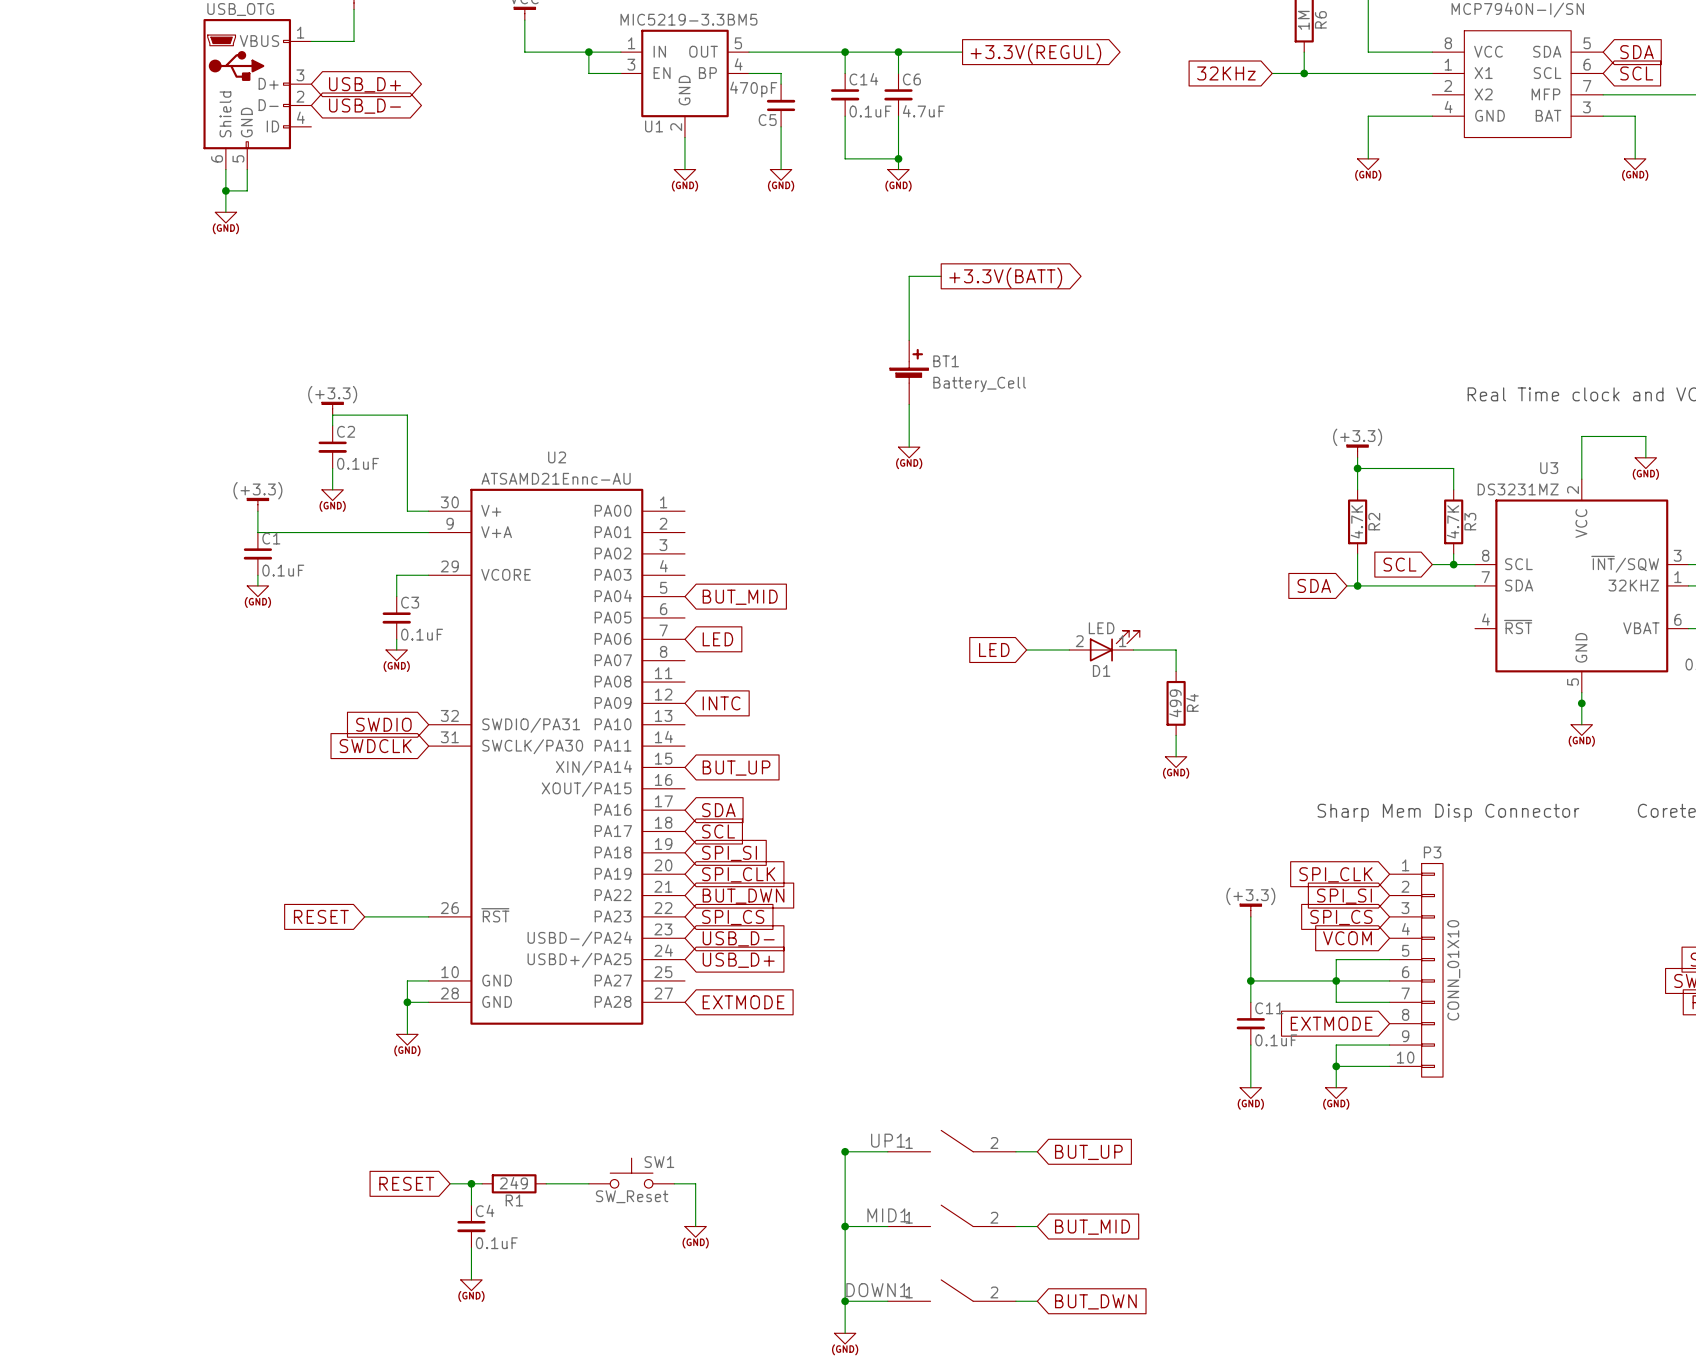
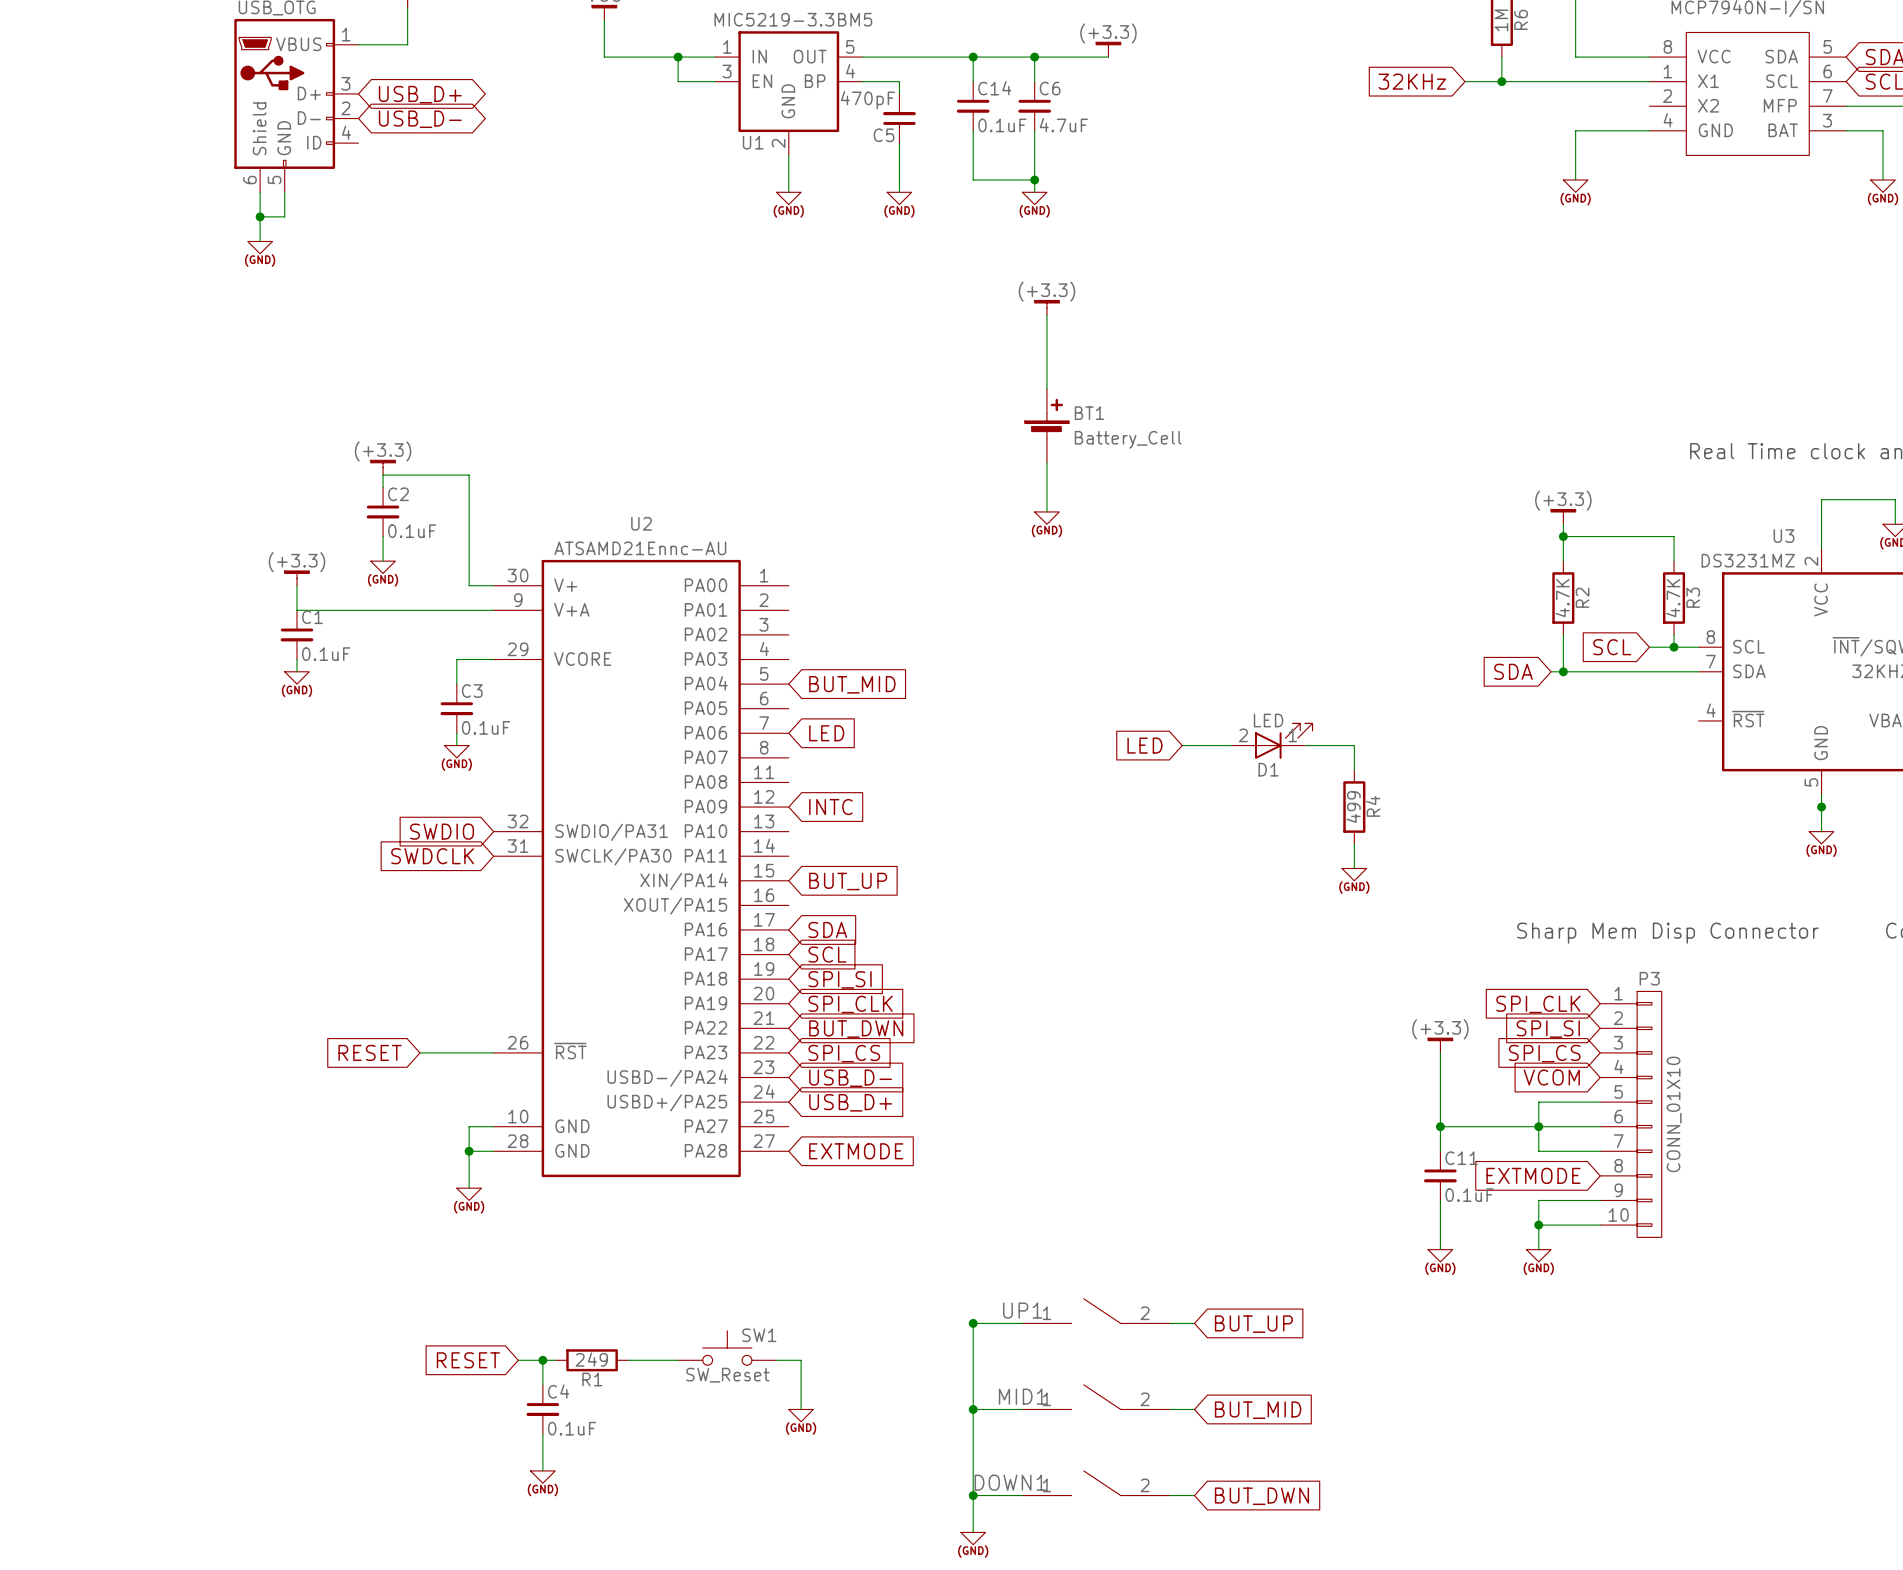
power symbol: none -> (+3.3) (1108, 49)
global label: +3.3V(REGUL) (1035, 53) -> none
power symbol: none -> (+3.3) (1046, 307)
wire: (909, 276) (941, 276) -> none
global label: +3.3V(BATT) (1005, 277) -> none

